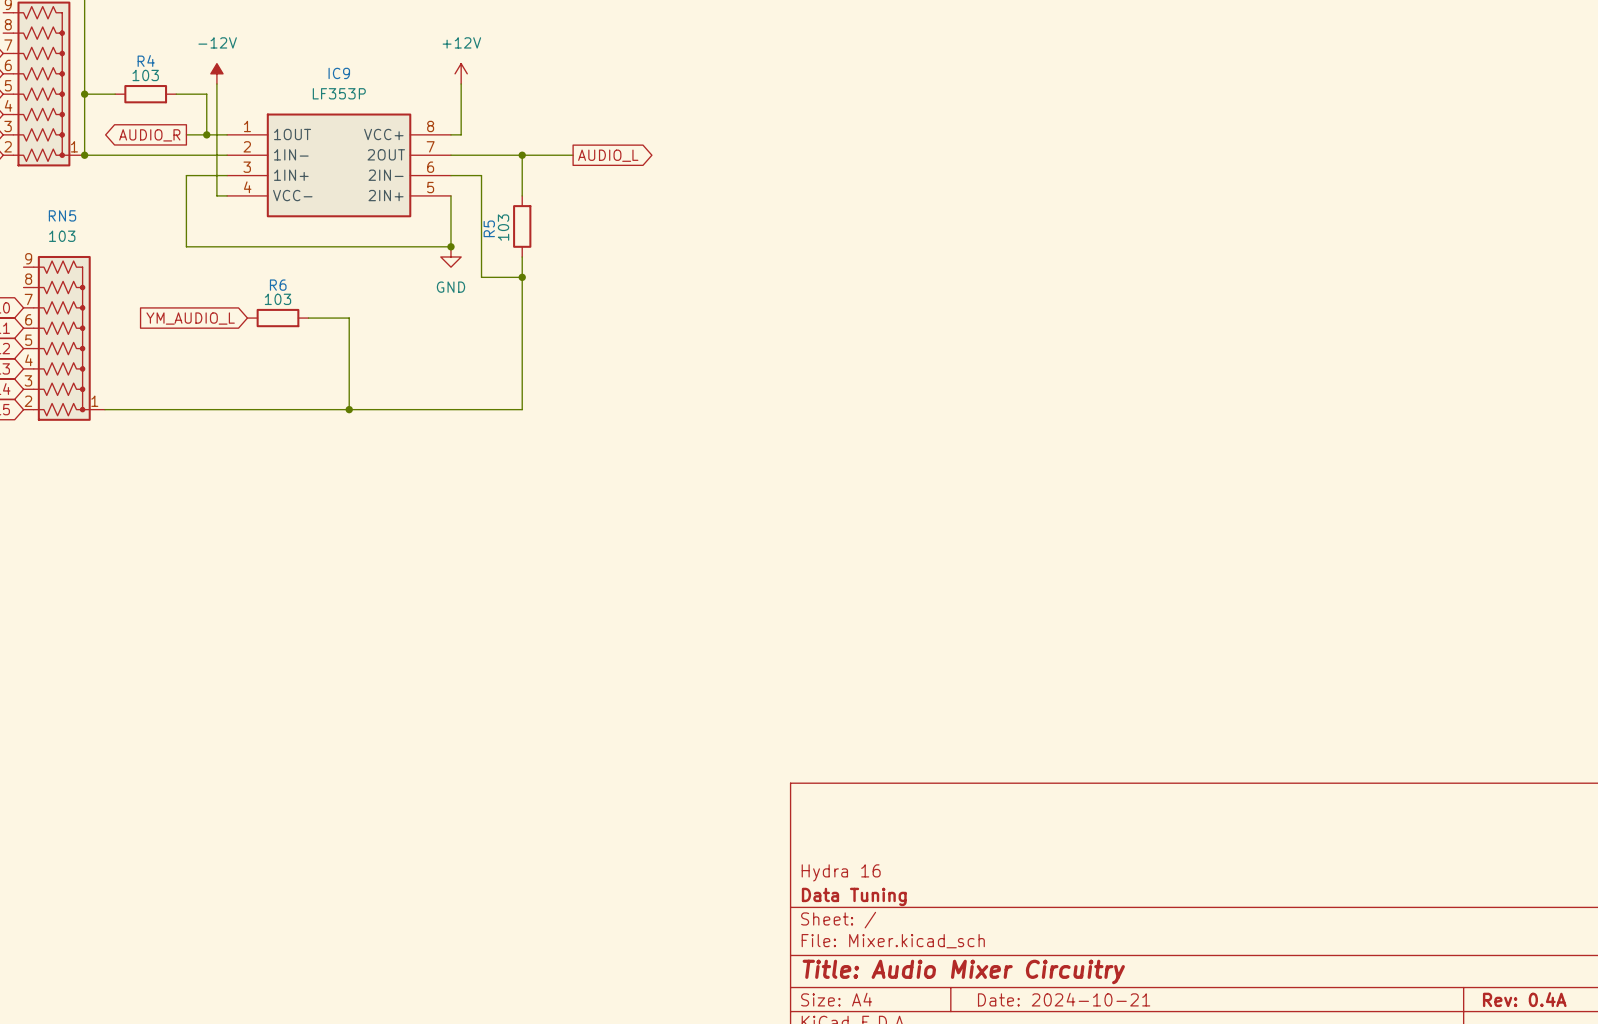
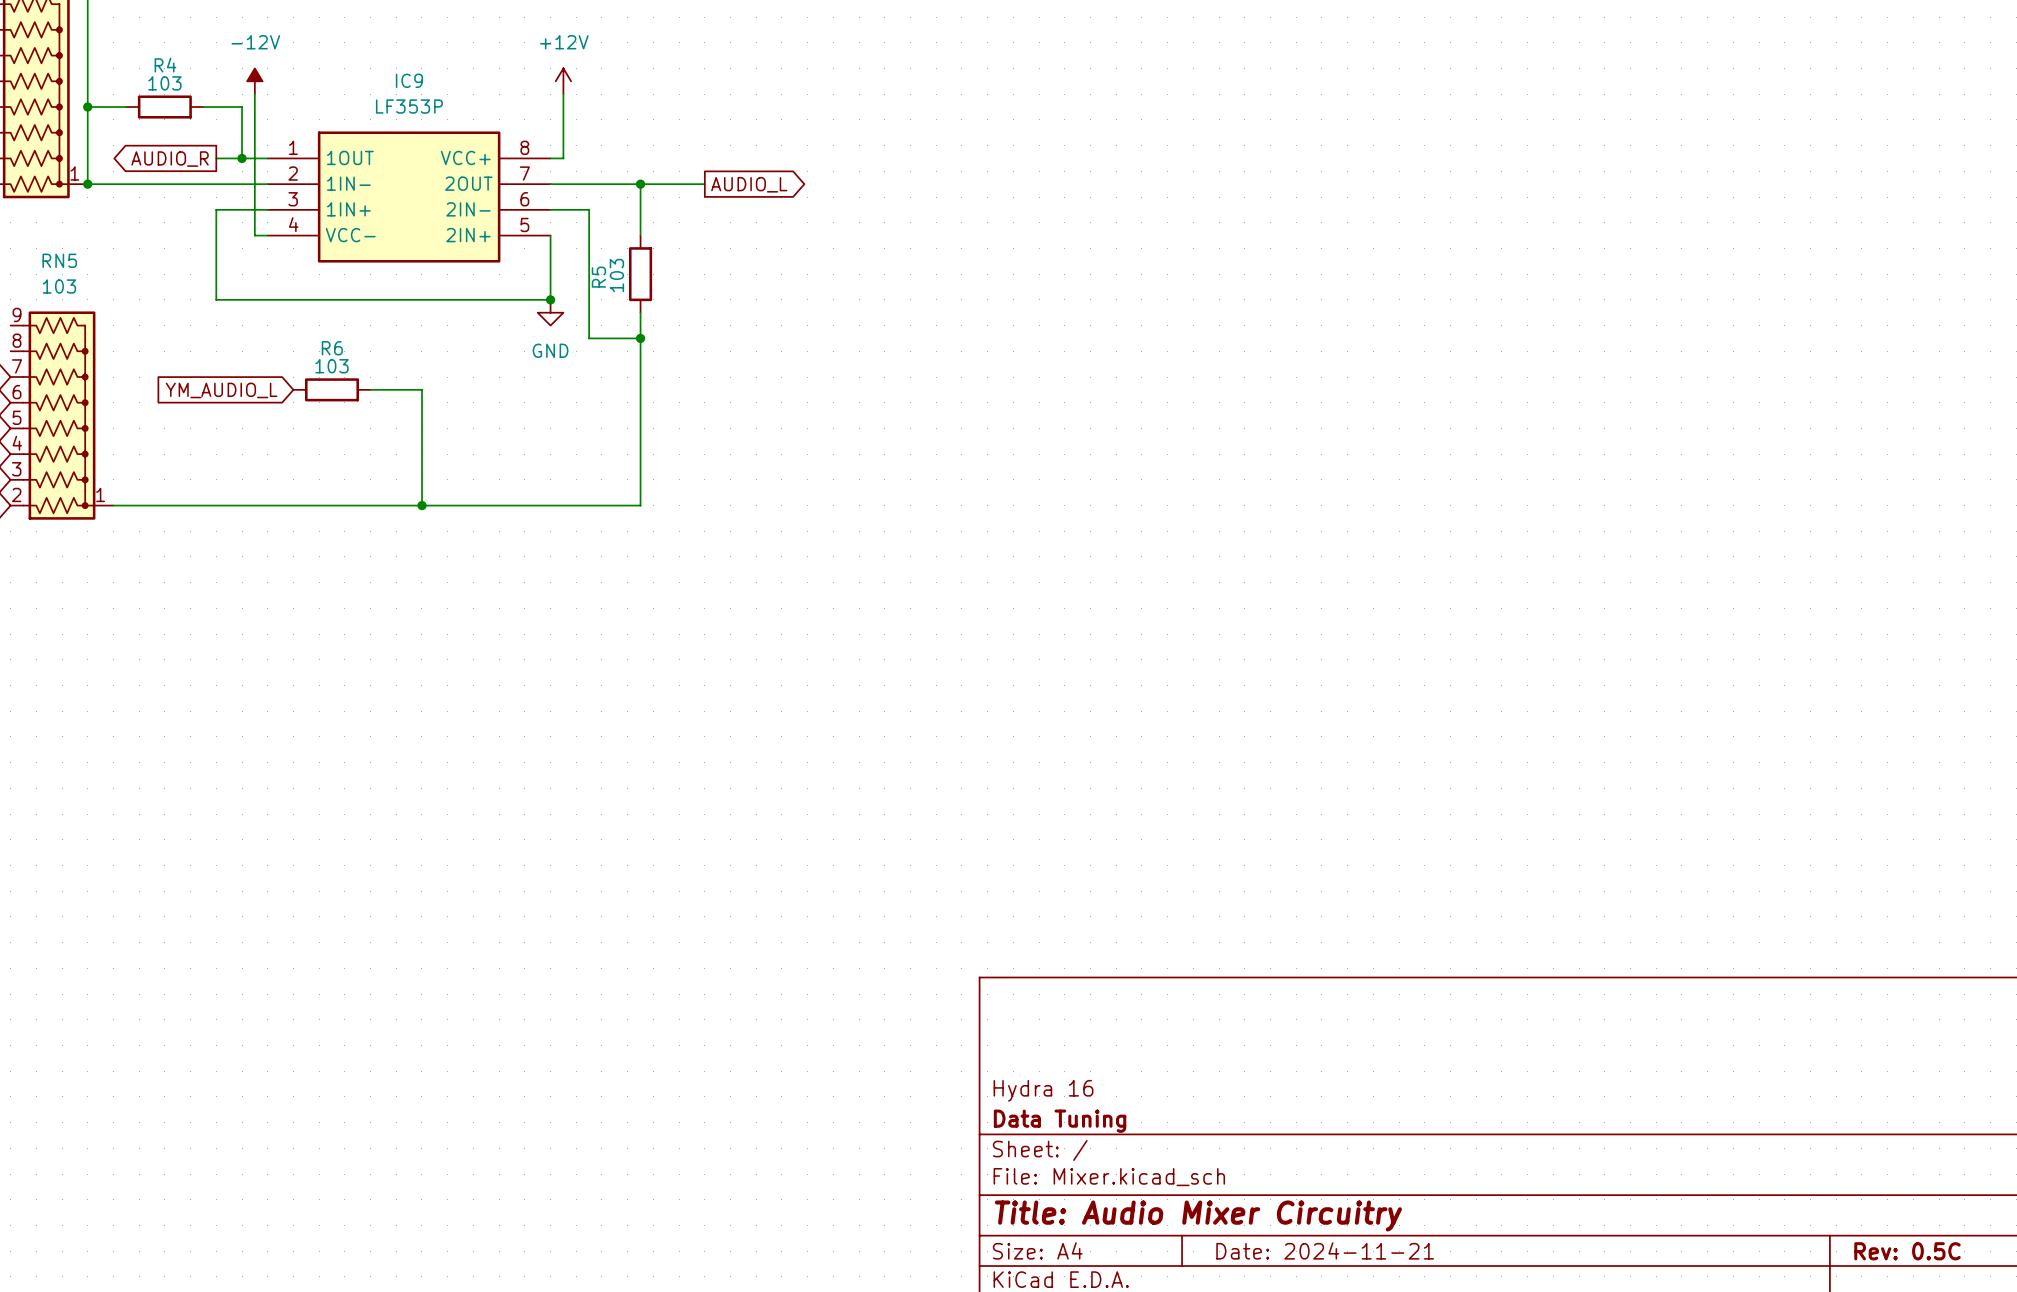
title block: Date: 2024-10-21 (1064, 999) -> Date: 2024-11-21 (1325, 1250)
title block: Rev: 0.4A (1524, 999) -> Rev: 0.5C (1907, 1251)

